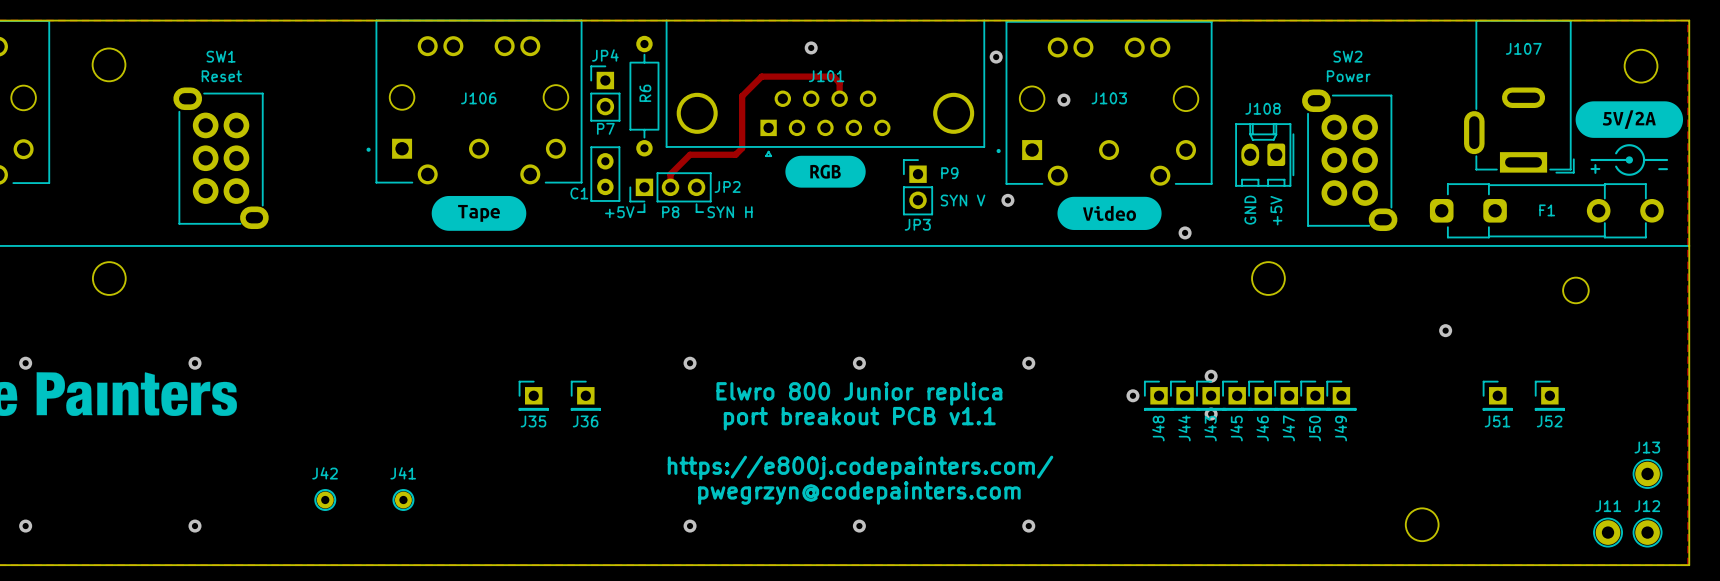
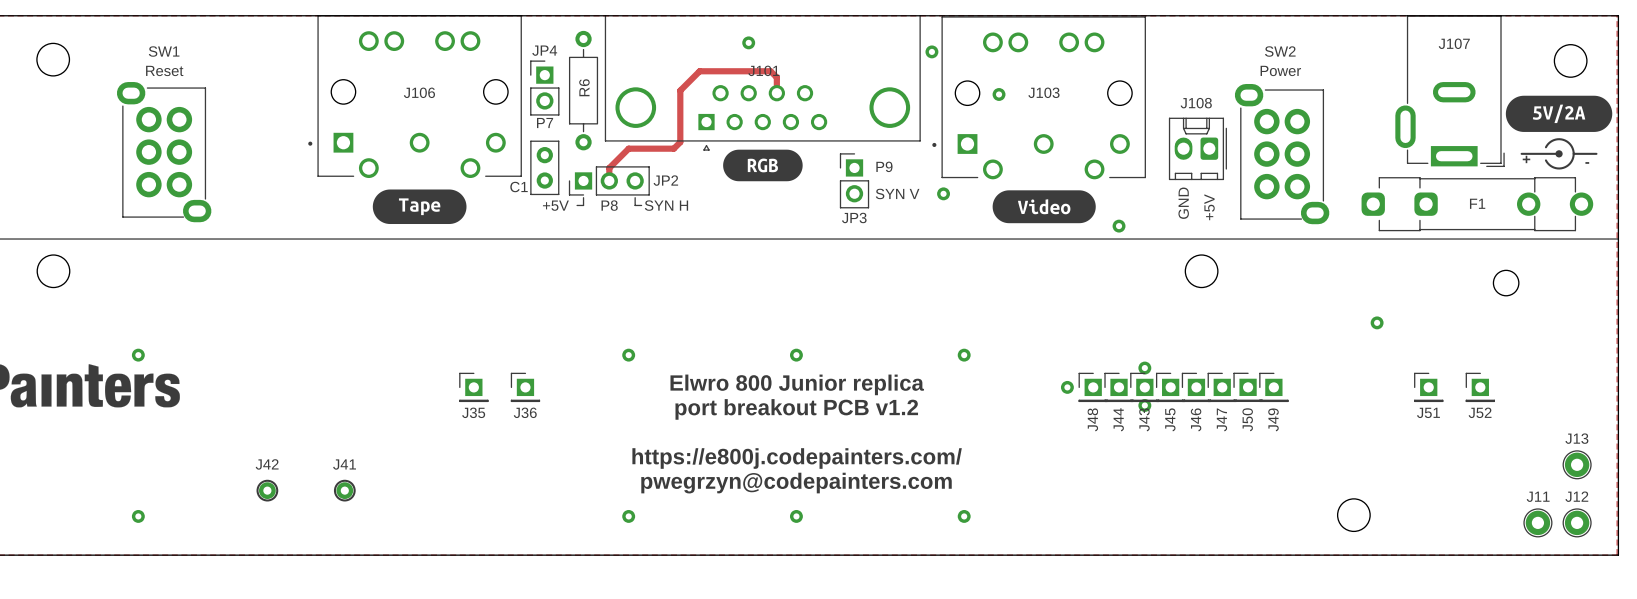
text: port breakout PCB v1.1 (859, 418) -> port breakout PCB v1.2 (796, 409)

